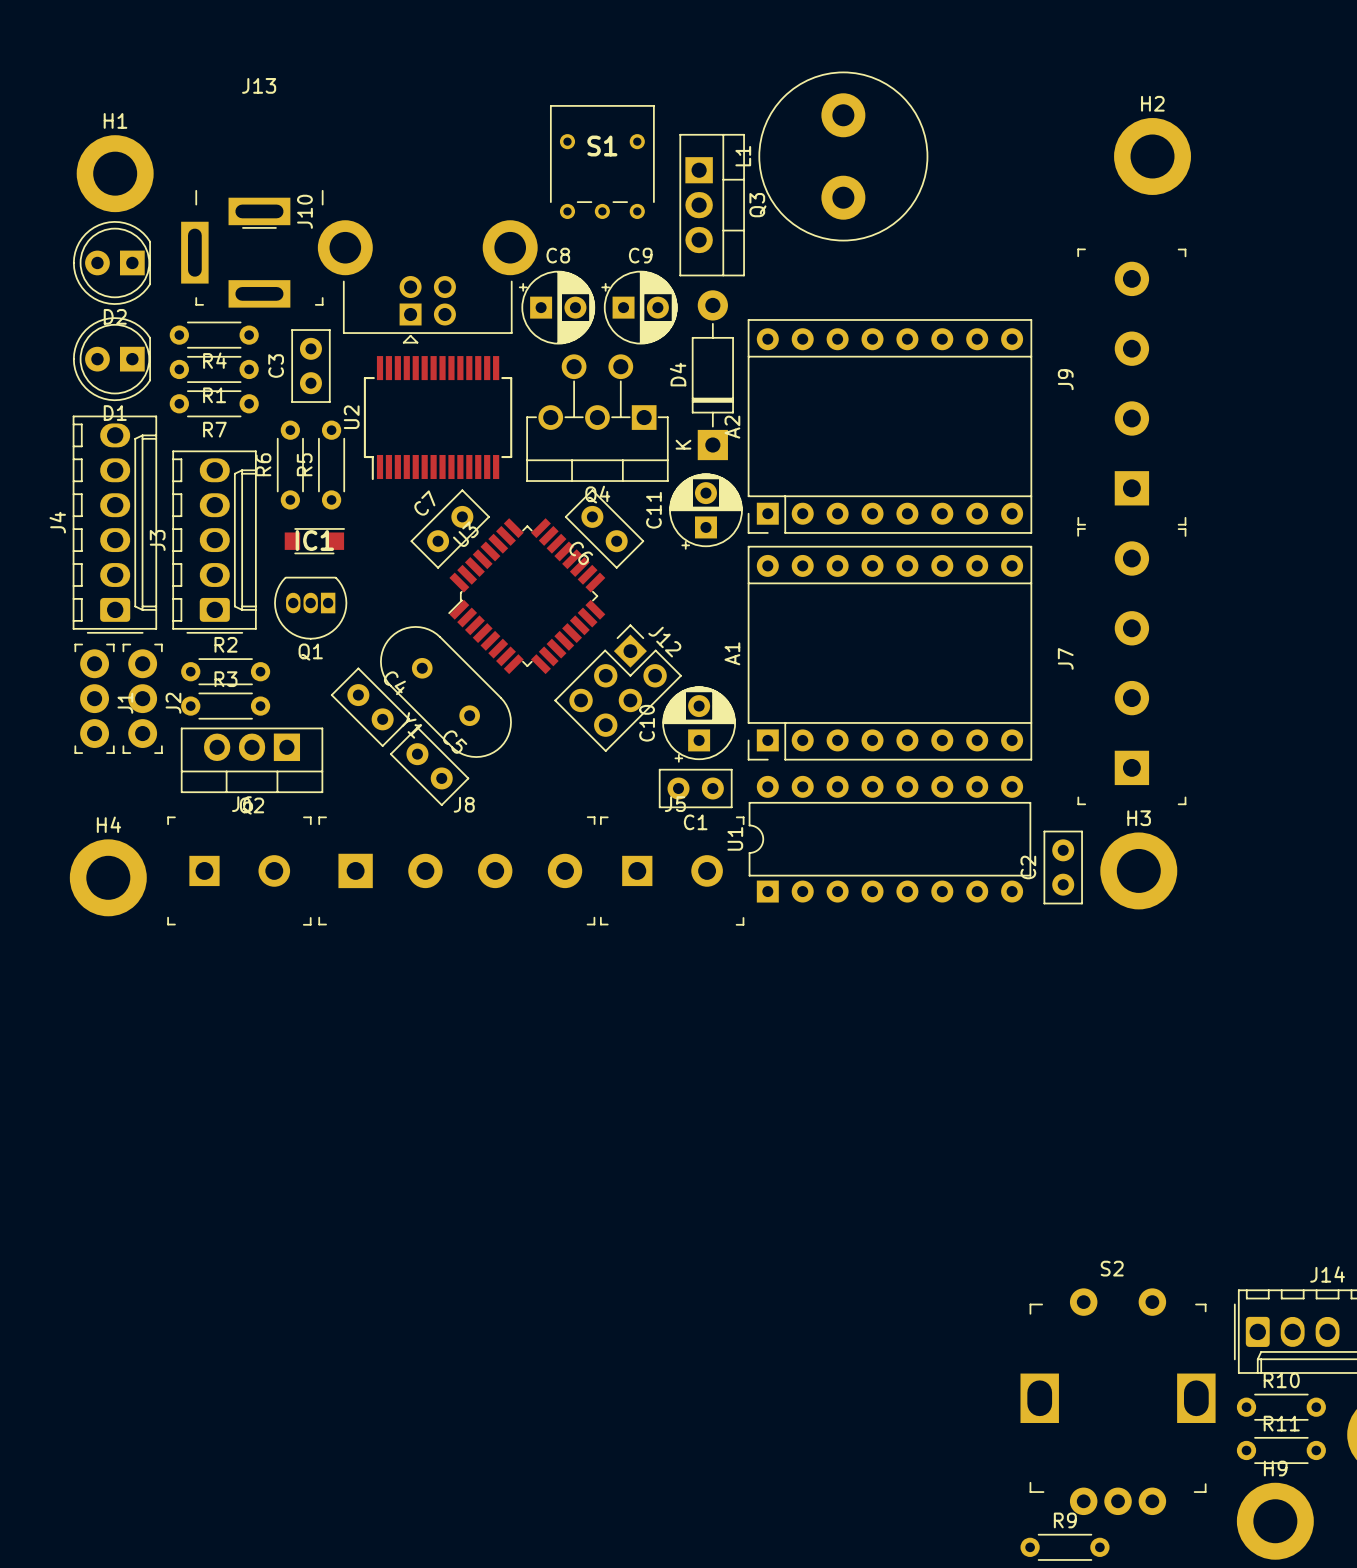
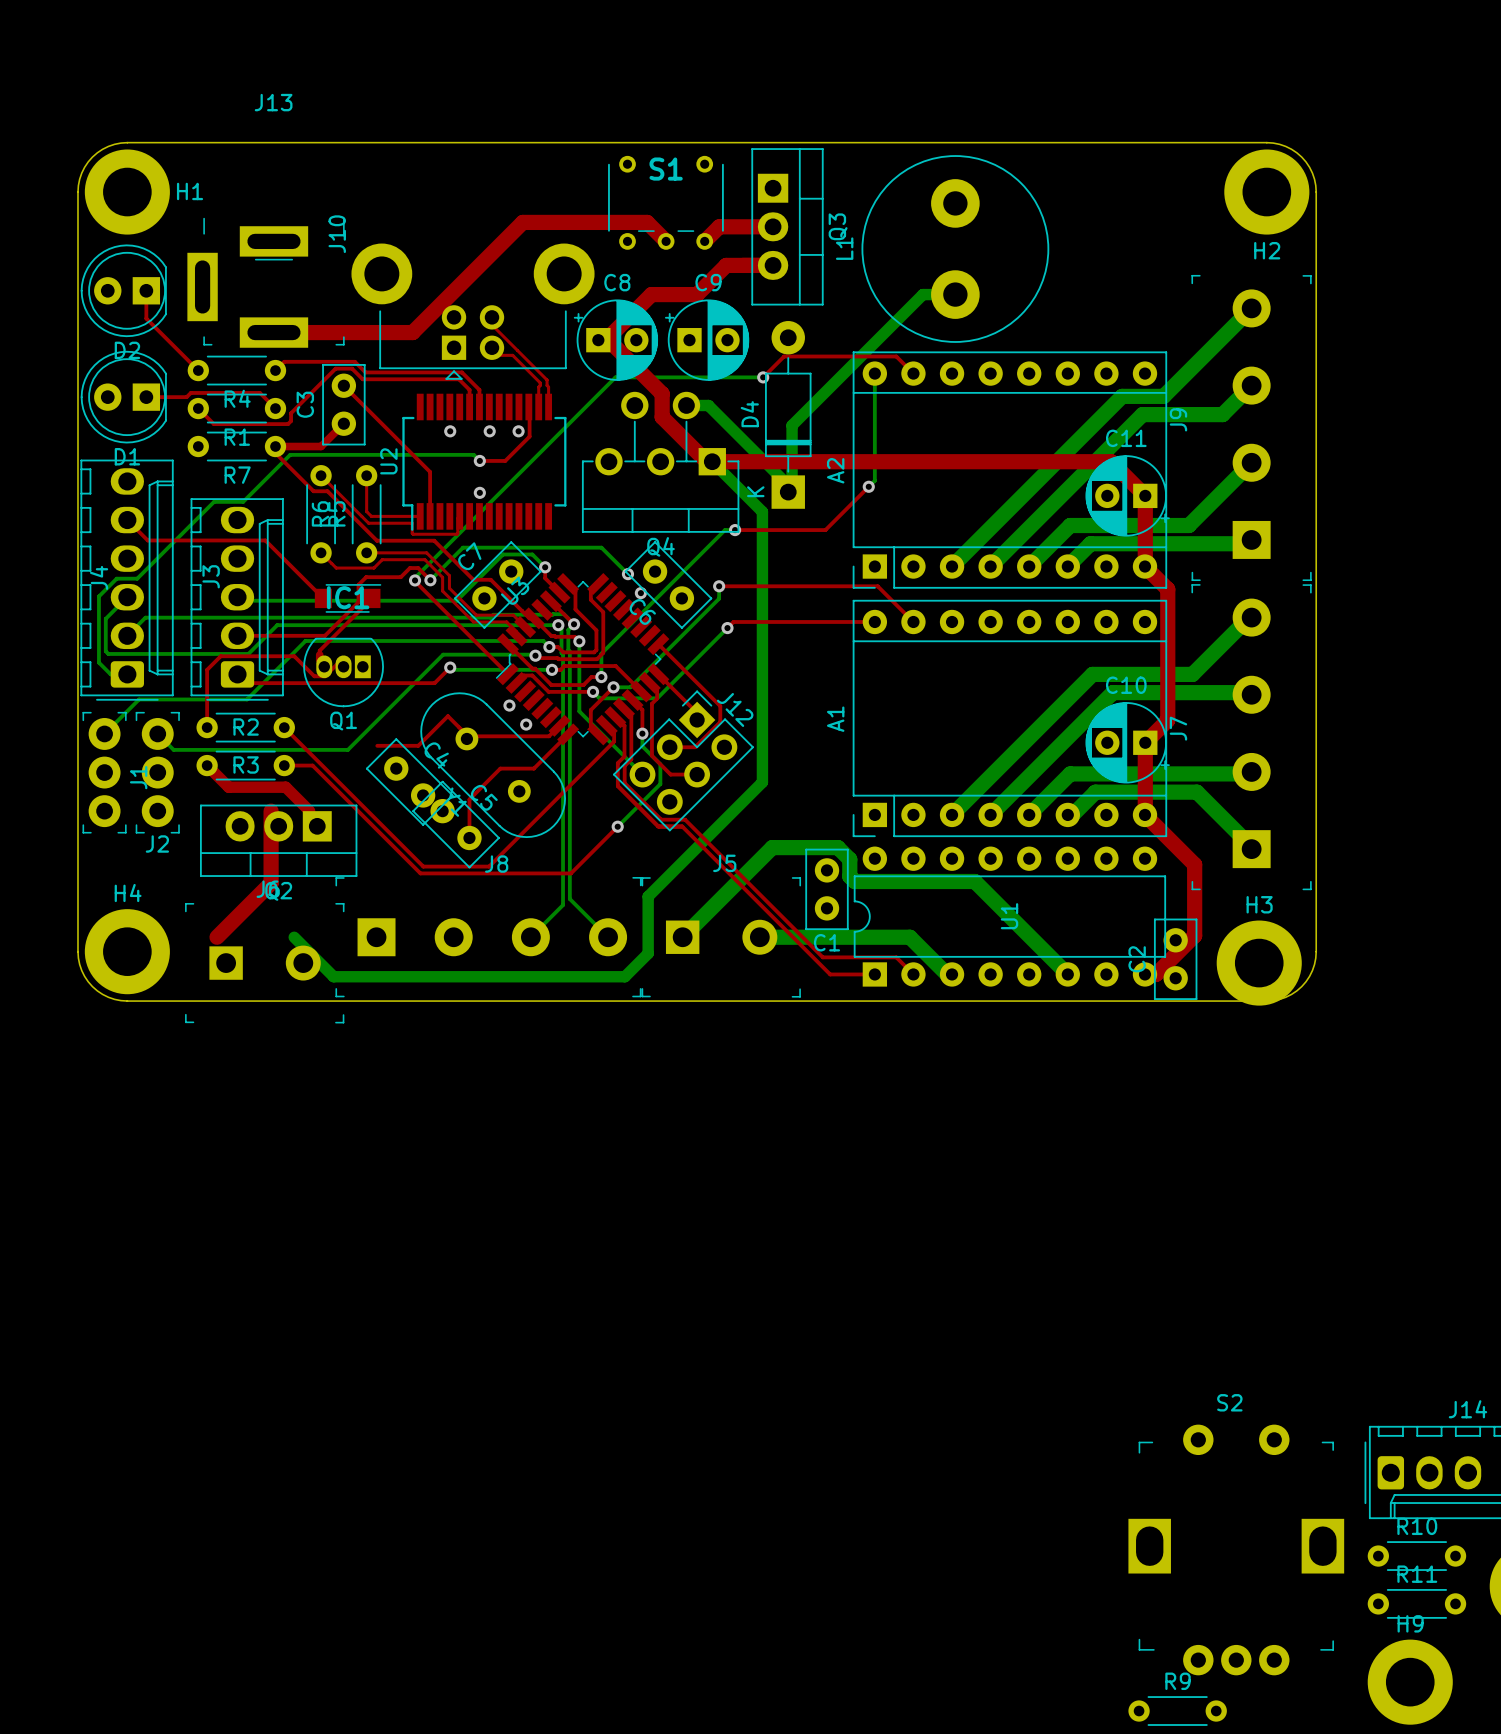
H2 name position: H2 (1152, 103) -> H2 (1267, 250)
S1 footprint: [550, 105, 655, 220] -> [608, 155, 724, 250]
H1 name position: H1 (115, 120) -> H1 (190, 191)
board edge: none -> (127, 142) (1266, 142) (1279, 144) (1296, 152) (1306, 161) (1312, 173) (1316, 192) (1316, 951) (1314, 964) (1306, 981) (1291, 994) (1279, 999) (1266, 1001) (127, 1001) (114, 999) (97, 990) (84, 976) (79, 964) (77, 951) (77, 192) (81, 173) (92, 157) (108, 146) (127, 142)
L1 position: (843, 156) -> (955, 249)
H2 position: (1152, 156) -> (1266, 192)
top track: none -> (773, 226) (719, 226) (704, 241)
top track: none -> (666, 241) (647, 222) (522, 222) (412, 332) (273, 332)
top track: none -> (773, 265) (726, 265) (697, 294) (651, 294) (605, 340) (608, 340) (662, 393) (662, 417) (706, 461) (1111, 461) (1145, 495) (1144, 566) (1167, 589) (1167, 720) (1145, 742) (1144, 814) (1194, 864) (1194, 935) (1155, 974) (1144, 974)
J13 position: (252, 248) -> (266, 282)
top track: none -> (146, 290) (146, 318) (198, 370)
bottom track: none -> (955, 294) (922, 294) (792, 425) (792, 489) (708, 405) (686, 405)
bottom track: none -> (1251, 308) (1163, 396) (1122, 396) (952, 566)
top track: none -> (492, 324) (547, 380) (548, 407)
top track: none -> (492, 355) (512, 355) (540, 382) (538, 407)
top track: none -> (275, 370) (284, 361) (354, 361) (365, 372) (461, 372) (479, 389) (479, 407)
bottom track: none -> (874, 373) (874, 480) (868, 486)
top track: none -> (913, 373) (896, 356) (784, 356) (763, 377)
bottom track: none -> (763, 377) (615, 377) (415, 577) (415, 580)
via: none -> (763, 377)
top track: none -> (343, 385) (430, 471) (430, 516)
bottom track: none -> (1251, 385) (1222, 414) (1142, 414) (990, 566)
top track: none -> (152, 391) (146, 397) (186, 397) (190, 392) (259, 392) (275, 408)
top track: none -> (469, 407) (469, 389) (458, 379) (362, 379) (352, 368) (335, 368) (291, 413) (291, 421) (288, 424) (213, 424) (198, 408)
top track: none -> (528, 407) (529, 436) (505, 460) (479, 460)
top track: none -> (343, 423) (321, 446) (275, 446) (275, 453) (313, 491) (327, 491) (376, 540) (434, 540) (473, 579) (490, 579) (529, 618) (533, 618) (551, 636) (574, 636) (579, 641)
via: none -> (450, 431)
via: none -> (489, 431)
via: none -> (518, 431)
bottom track: none -> (479, 460) (473, 454) (290, 454) (243, 501) (214, 501) (137, 578) (116, 578) (98, 596) (98, 662) (110, 674) (127, 674)
via: none -> (479, 460)
bottom track: none -> (712, 461) (762, 511) (762, 782) (648, 896) (648, 953) (624, 976) (333, 976) (294, 937)
bottom track: none -> (1251, 462) (1188, 525) (1070, 525) (1029, 566)
A2 position: (889, 426) -> (1009, 470)
top track: none -> (321, 475) (368, 523) (412, 523) (413, 534) (456, 534) (457, 518) (459, 516)
top track: none -> (366, 475) (366, 511) (371, 516) (420, 516)
top track: none -> (868, 486) (825, 530) (735, 530)
via: none -> (868, 486)
via: none -> (479, 492)
R6 name position: R6 (263, 464) -> R6 (320, 513)
top track: none -> (127, 520) (147, 540) (265, 540) (323, 598)
bottom track: none -> (735, 530) (724, 530) (601, 653) (601, 677)
via: none -> (735, 530)
bottom track: none -> (1251, 539) (1247, 543) (1090, 543) (1067, 566)
top track: none -> (368, 550) (366, 552) (426, 552) (449, 575) (449, 588) (476, 615) (513, 615) (525, 626)
top track: none -> (321, 552) (336, 568) (373, 568) (382, 559) (424, 559) (442, 577) (442, 591) (473, 621) (506, 621) (516, 631) (516, 635)
C11 name position: C11 (653, 510) -> C11 (1126, 438)
C11 rotation: 0° (705, 511) -> 90° counterclockwise (1127, 495)
C11 position: (705, 511) -> (1127, 495)
top track: none -> (545, 567) (545, 578) (559, 592)
bottom track: none -> (545, 567) (532, 554) (503, 554) (456, 600) (241, 600) (237, 597)
via: none -> (545, 567)
bottom track: none -> (627, 574) (601, 547) (463, 547) (430, 580)
via: none -> (627, 574)
J4 name position: J4 (57, 522) -> J4 (99, 577)
top track: none -> (415, 580) (507, 674)
via: none -> (415, 580)
top track: none -> (430, 580) (418, 568) (409, 568) (400, 577) (366, 577) (358, 584) (358, 602) (324, 635) (237, 635)
via: none -> (430, 580)
top track: none -> (568, 584) (575, 591) (575, 609) (596, 630) (596, 650) (594, 652) (563, 652) (557, 647) (549, 647)
top track: none -> (598, 584) (590, 591) (590, 599) (603, 612) (603, 652) (596, 659) (537, 658) (535, 655)
top track: none -> (719, 586) (877, 586) (913, 621)
bottom track: none -> (719, 586) (719, 598) (630, 687) (613, 687)
via: none -> (719, 586)
via: none -> (640, 593)
bottom track: none -> (127, 597) (105, 618) (105, 651) (108, 653) (248, 653) (277, 625) (558, 625) (561, 628) (563, 654) (563, 905) (530, 937)
J3 name position: J3 (157, 540) -> J3 (211, 576)
top track: none -> (371, 598) (319, 650) (319, 659) (319, 654)
top track: none -> (550, 601) (574, 624)
bottom track: none -> (1251, 615) (1192, 674) (1092, 674) (952, 814)
top track: none -> (874, 621) (733, 621) (727, 628)
via: none -> (574, 624)
via: none -> (558, 625)
bottom track: none -> (727, 628) (657, 698) (599, 698) (593, 691)
via: none -> (727, 628)
bottom track: none -> (127, 635) (145, 617) (490, 617) (493, 614) (563, 614) (574, 624) (568, 629) (569, 899) (608, 937)
bottom track: none -> (579, 641) (579, 711) (642, 774)
via: none -> (579, 641)
top track: none -> (507, 644) (551, 685) (583, 685) (591, 677) (601, 677)
top track: none -> (658, 644) (720, 706) (720, 722) (695, 747) (669, 747)
bottom track: none -> (549, 647) (543, 640) (305, 640) (247, 699) (139, 699) (104, 733)
via: none -> (549, 647)
bottom track: none -> (535, 655) (443, 654) (347, 749) (173, 749) (157, 733)
via: none -> (535, 655)
top track: none -> (339, 659) (339, 662) (325, 676) (314, 676) (294, 656) (220, 656) (207, 669) (207, 727)
top track: none -> (450, 667) (434, 683) (246, 683) (237, 674)
bottom track: none -> (450, 667) (452, 669) (552, 669)
via: none -> (450, 667)
top track: none -> (552, 669) (560, 669) (564, 666) (615, 666) (641, 691)
via: none -> (552, 669)
top track: none -> (658, 674) (697, 713) (697, 719)
via: none -> (601, 677)
top track: none -> (516, 682) (523, 675) (532, 675) (548, 691) (593, 691)
top track: none -> (649, 682) (657, 690) (657, 698) (651, 703) (651, 755) (670, 774) (697, 774)
top track: none -> (613, 687) (590, 710) (590, 727) (598, 734)
via: none -> (613, 687)
via: none -> (593, 691)
bottom track: none -> (1251, 692) (1112, 692) (990, 814)
top track: none -> (632, 700) (642, 709) (642, 733)
via: none -> (509, 705)
top track: none -> (623, 708) (631, 715) (631, 759) (624, 765) (624, 783) (661, 819) (685, 819) (822, 957) (896, 957) (913, 974)
R2 name position: R2 (225, 644) -> R2 (246, 727)
A1 position: (889, 653) -> (1009, 718)
via: none -> (526, 724)
top track: none -> (622, 724) (615, 717) (624, 725) (624, 756) (617, 763) (617, 785) (658, 826) (682, 826) (830, 974) (874, 974)
top track: none -> (559, 725) (549, 736) (468, 736) (447, 716) (418, 745) (377, 745)
top track: none -> (606, 725) (614, 733) (614, 741) (489, 866) (423, 866) (284, 727)
bottom track: none -> (642, 733) (642, 746) (660, 764) (660, 784) (617, 826)
via: none -> (642, 733)
top track: none -> (568, 734) (533, 768) (500, 768) (469, 799) (469, 838)
R2 position: (225, 671) -> (245, 727)
R3 name position: R3 (225, 679) -> R3 (246, 764)
top track: none -> (207, 765) (228, 787) (285, 787) (309, 811)
top track: none -> (284, 765) (312, 765) (420, 873) (571, 873) (617, 826)
bottom track: none -> (1251, 769) (1247, 773) (1070, 773) (1029, 814)
J2 name rotation: 0° (173, 703) -> 90° clockwise (157, 844)
J2 name position: J2 (173, 703) -> J2 (157, 844)
R3 position: (225, 706) -> (245, 765)
C10 name position: C10 (647, 723) -> C10 (1126, 685)
C10 rotation: 0° (699, 724) -> 90° counterclockwise (1127, 742)
C10 position: (699, 724) -> (1127, 742)
top track: none -> (271, 811) (271, 883) (217, 937)
bottom track: none -> (1067, 814) (1072, 814) (1095, 792) (1196, 792) (1251, 846)
via: none -> (617, 826)
C5 position: (429, 766) -> (456, 824)
C1 rotation: 0° (695, 788) -> 90° clockwise (827, 889)
C1 position: (695, 788) -> (827, 889)
U1 name position: U1 (735, 838) -> U1 (1009, 916)
U1 position: (889, 839) -> (1009, 916)
bottom track: none -> (682, 937) (772, 847) (837, 847) (849, 859) (849, 876) (854, 881) (974, 881) (1067, 974)
bottom track: none -> (759, 937) (909, 937) (947, 974) (952, 974)
J8 position: (456, 870) -> (488, 937)
J5 position: (672, 871) -> (721, 937)
H4 position: (108, 877) -> (127, 951)

